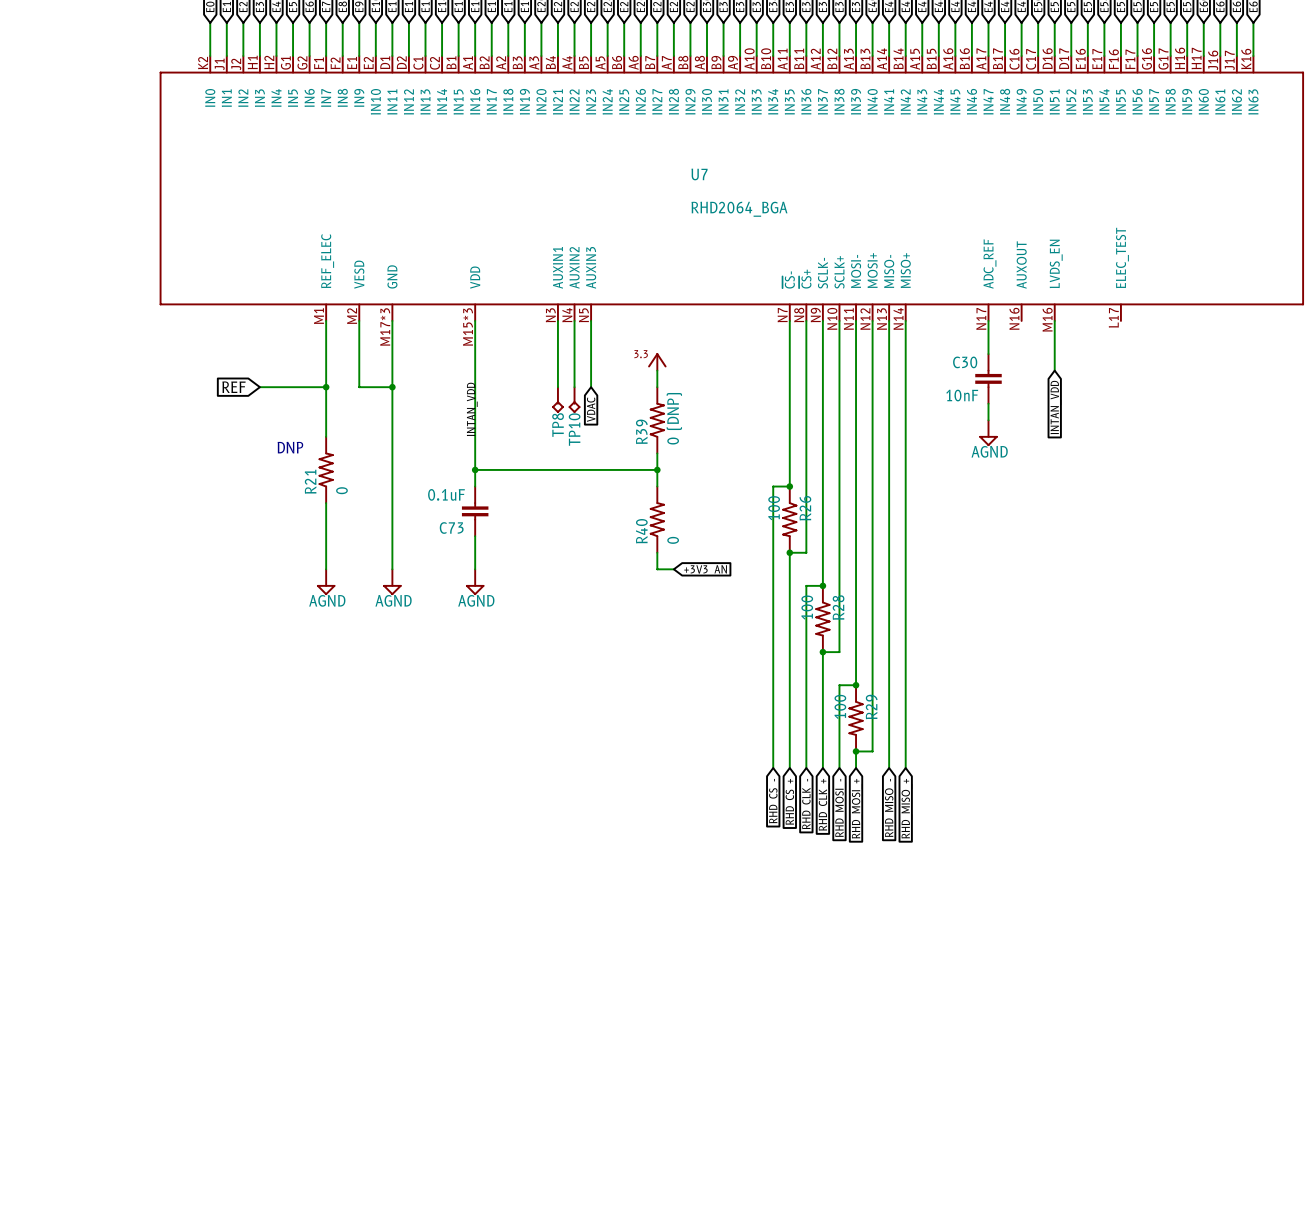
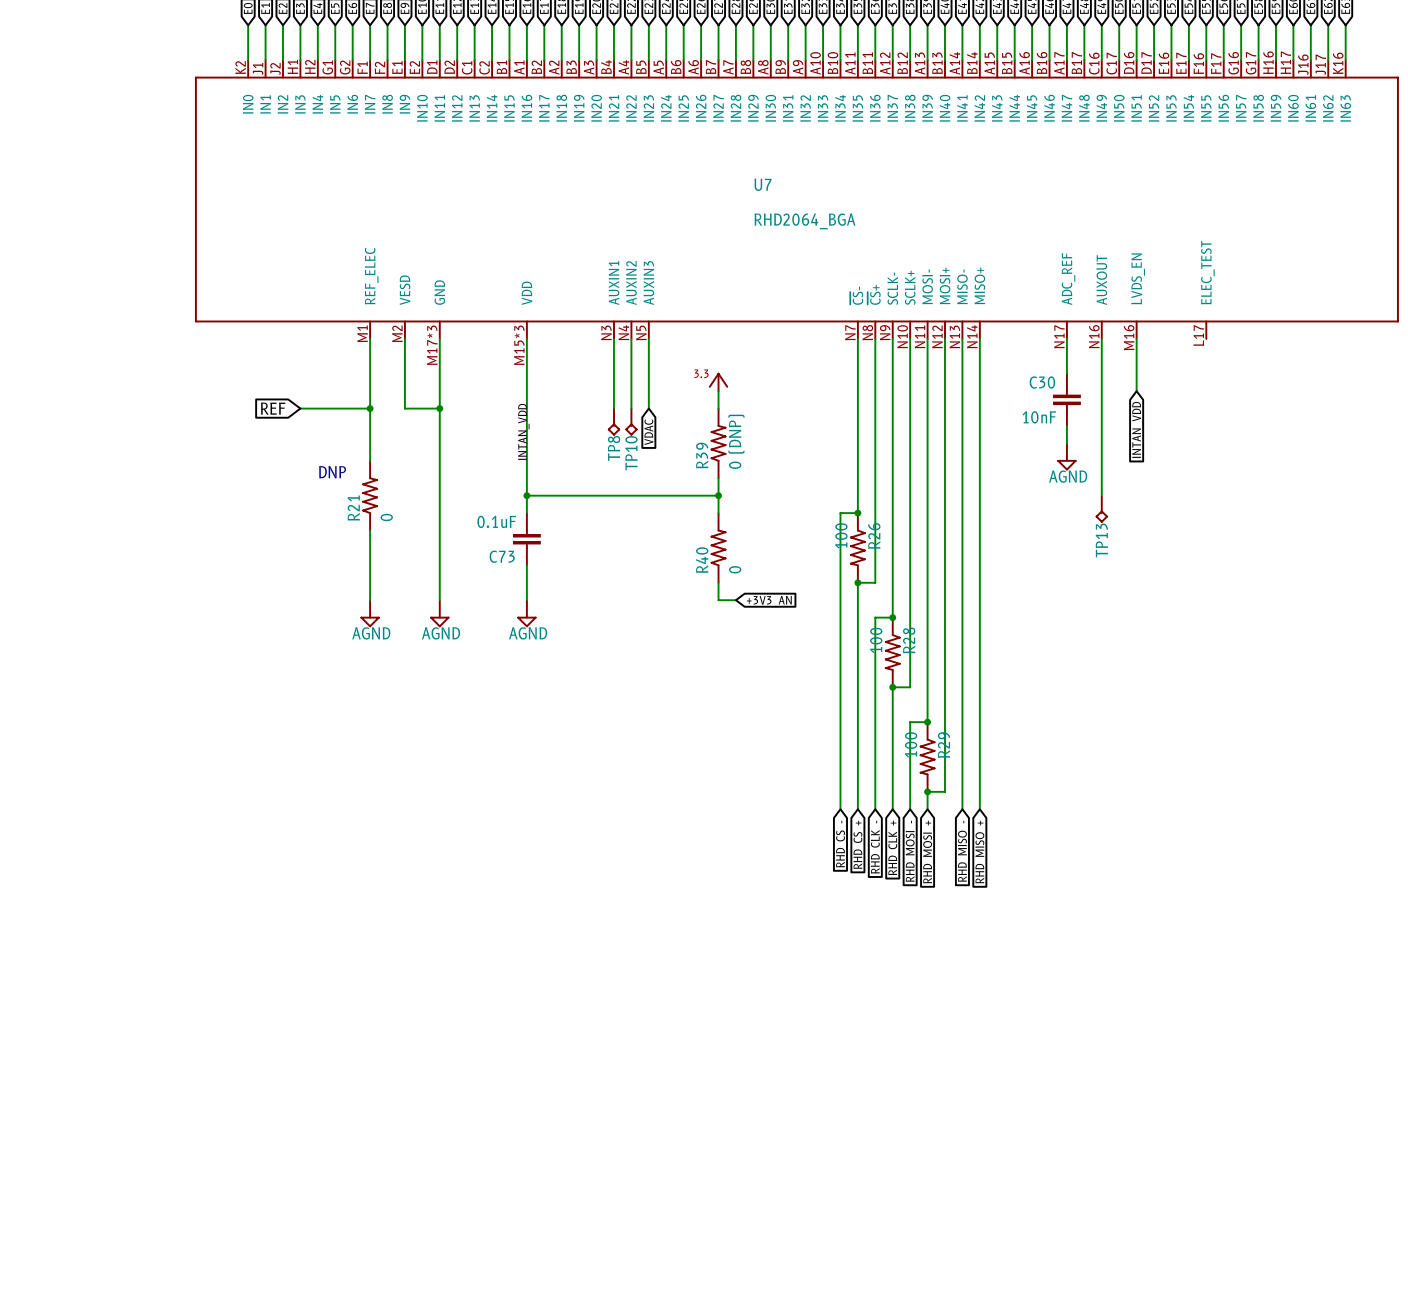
wire: none -> (1101, 338) (1101, 495)
TP13: none -> (1101, 509)

